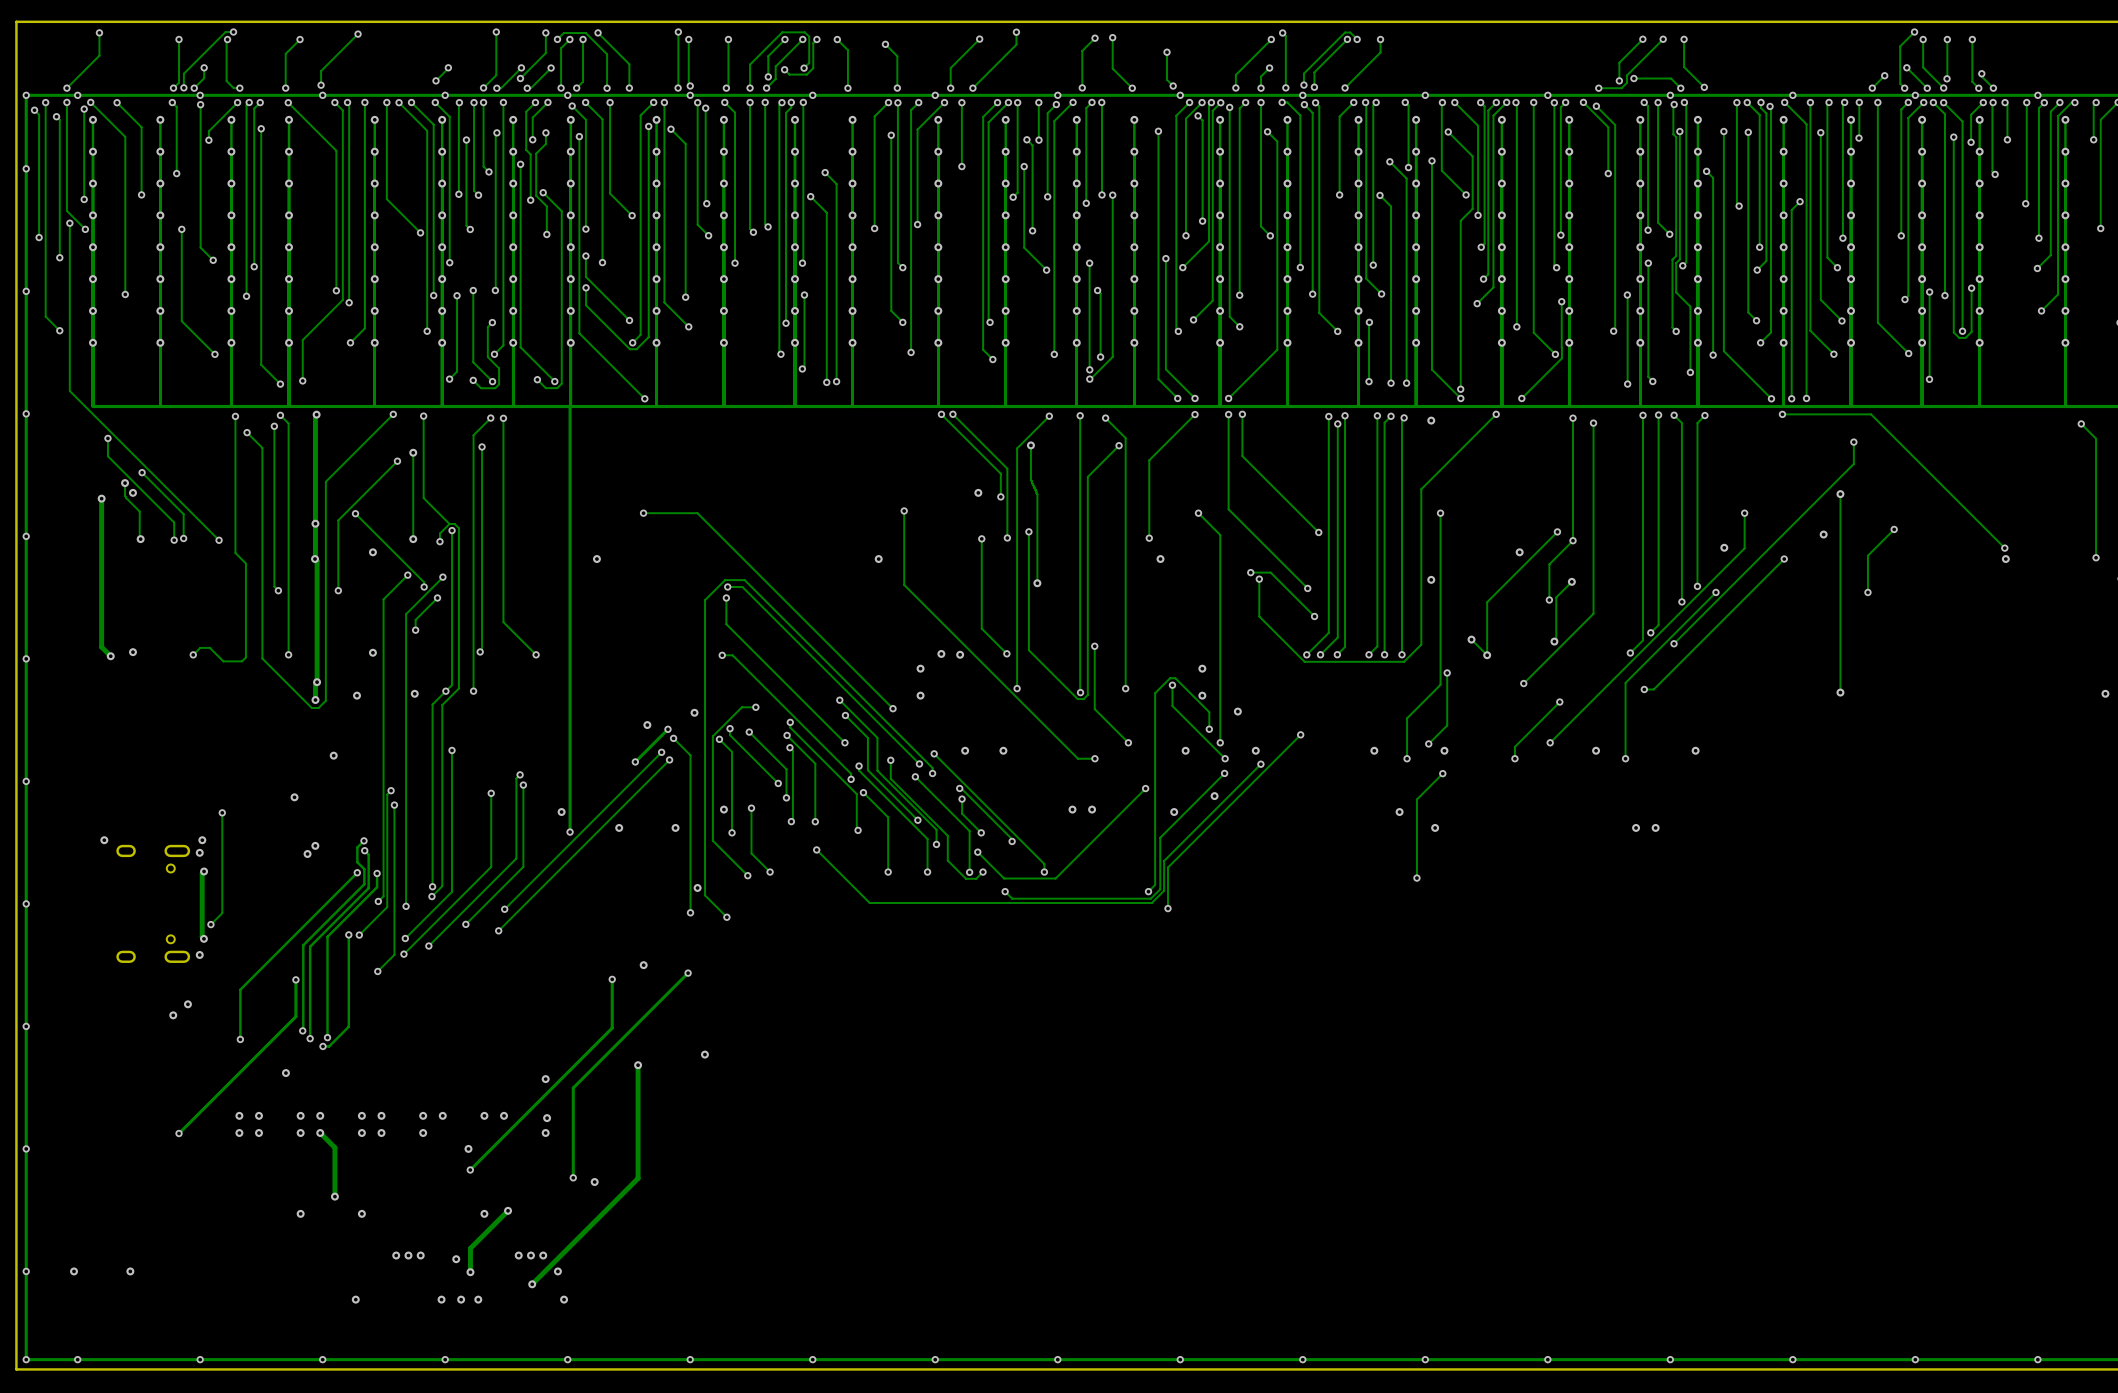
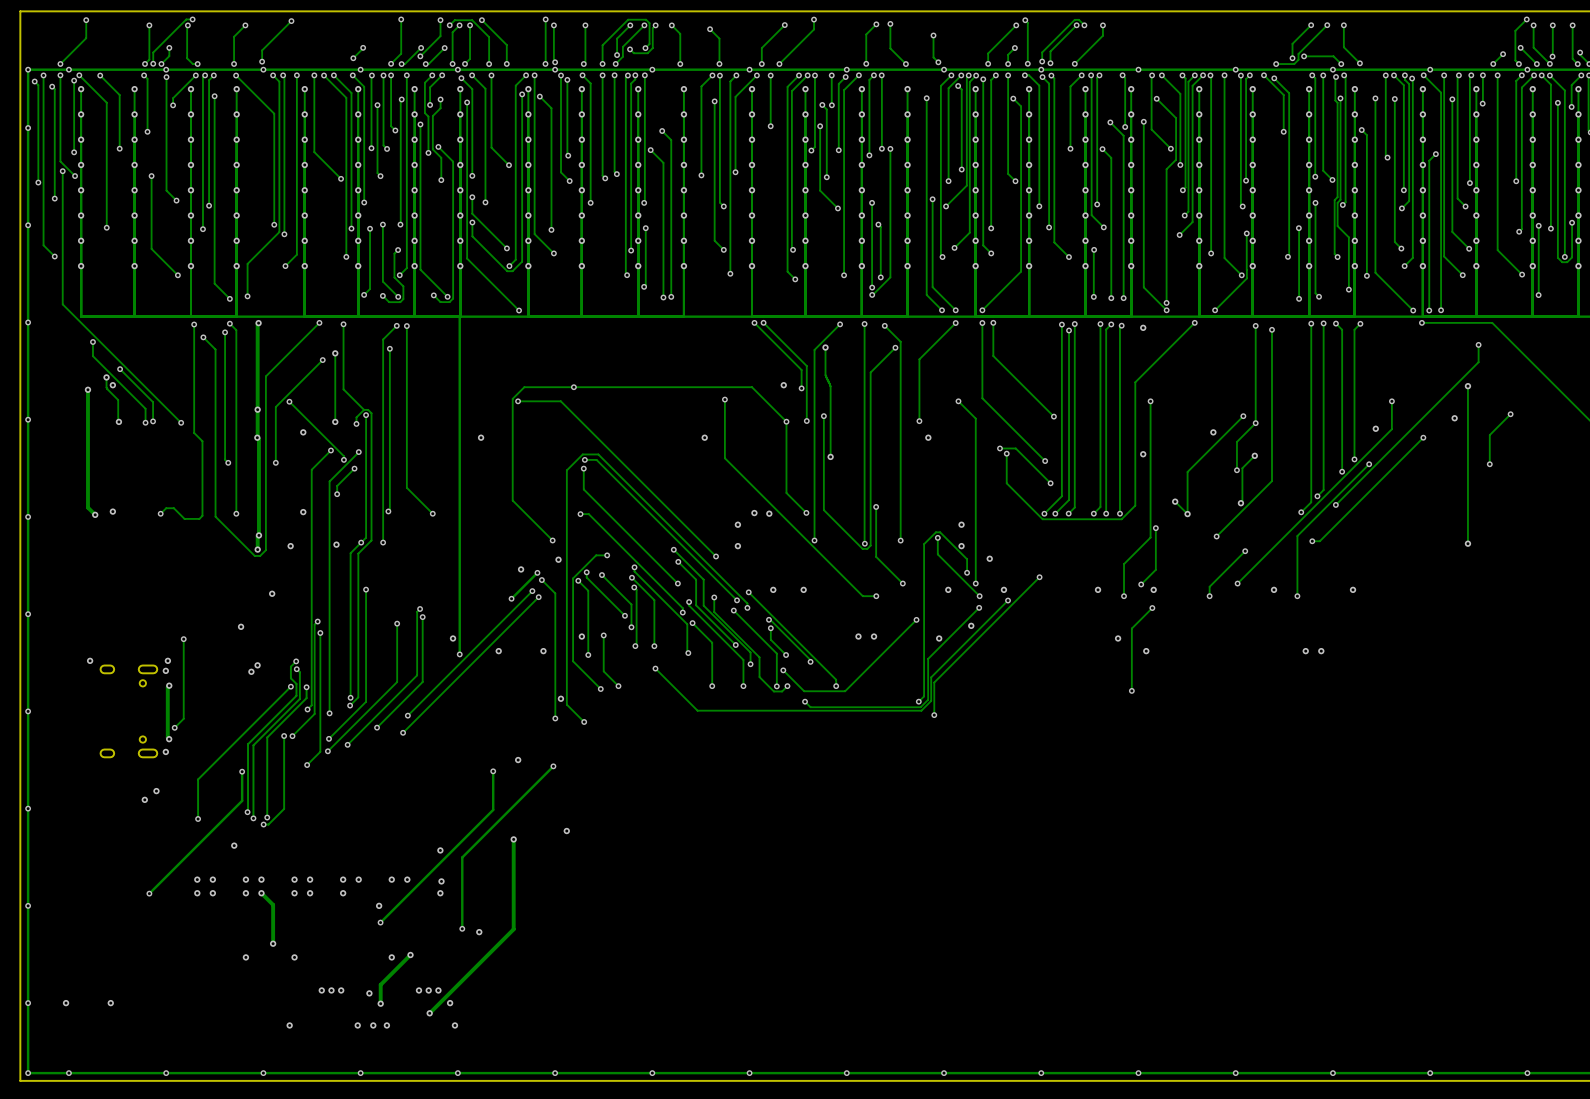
via: none -> (573, 387)
track: none -> (786, 421) (751, 387) (524, 387) (512, 398) (512, 500) (552, 540)
via: none -> (552, 540)

